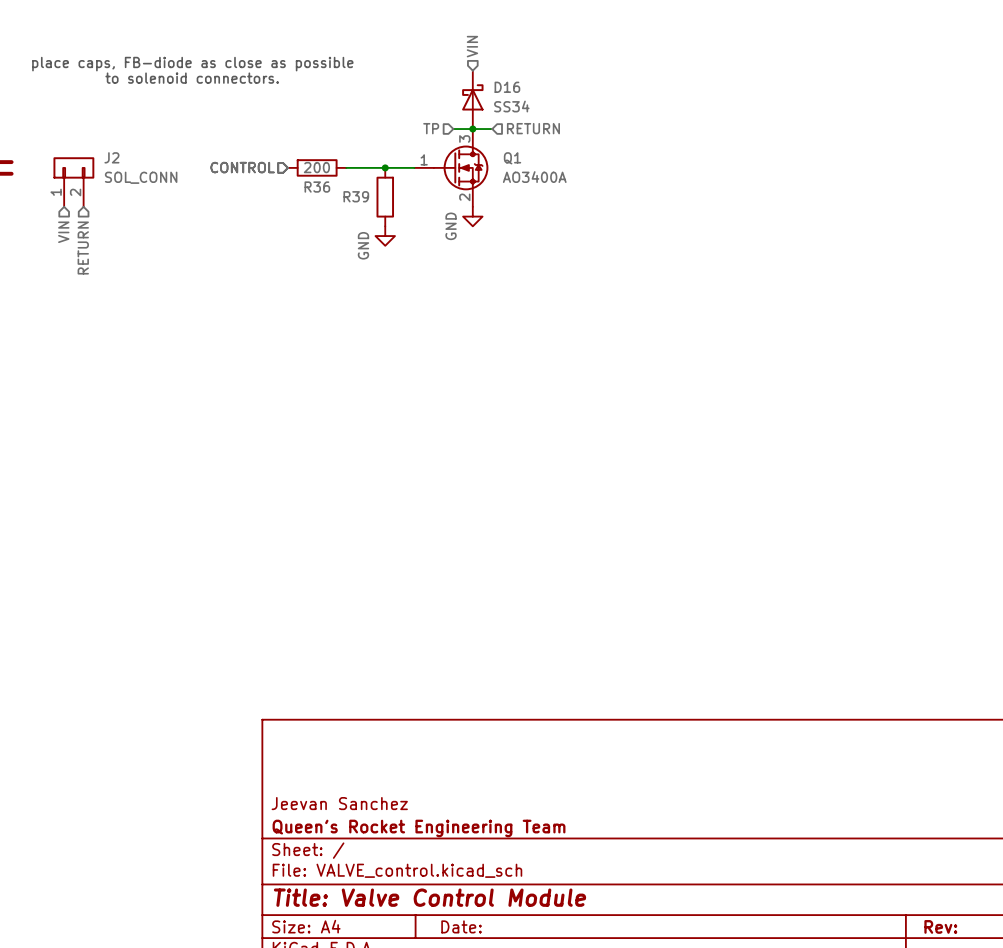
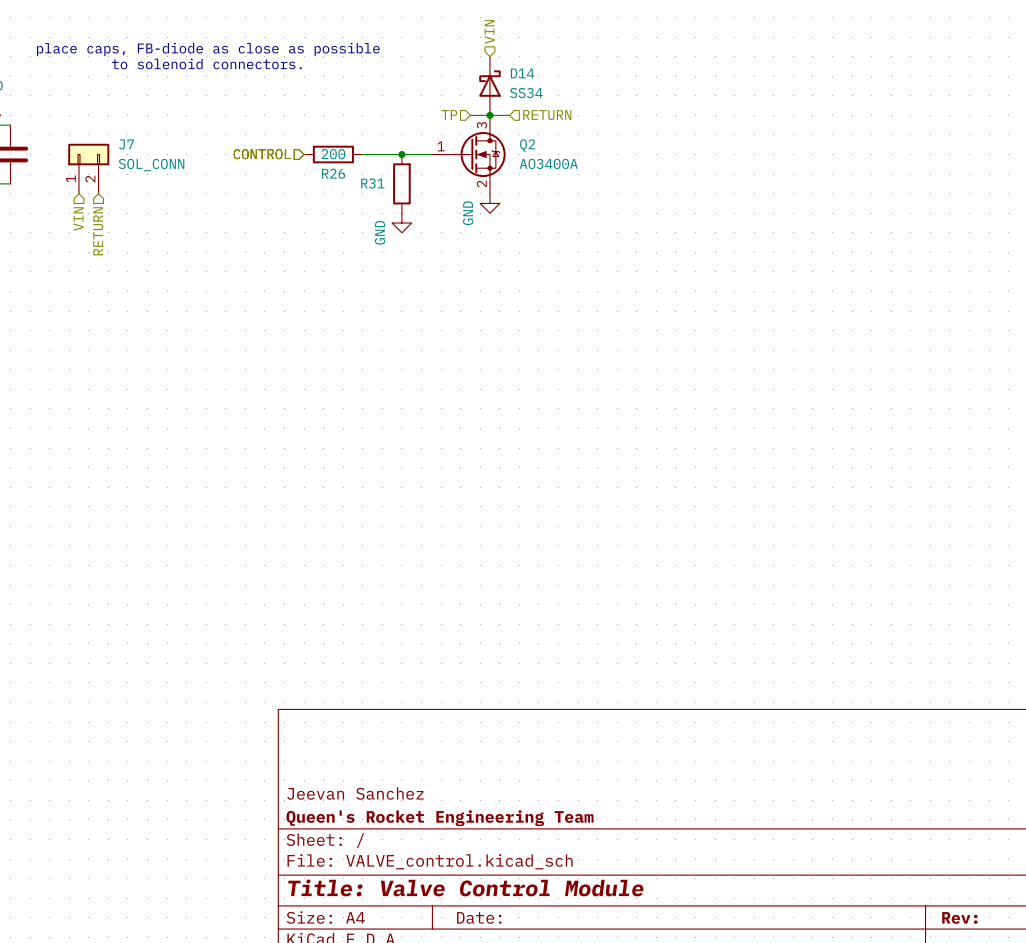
D16 name: D16 (507, 87) -> D14 (522, 73)
J2 name: J2 (111, 157) -> J7 (126, 144)
Q1 name: Q1 (512, 158) -> Q2 (527, 145)
R36 name: R36 (317, 187) -> R26 (333, 173)
R39 name: R39 (356, 196) -> R31 (372, 183)

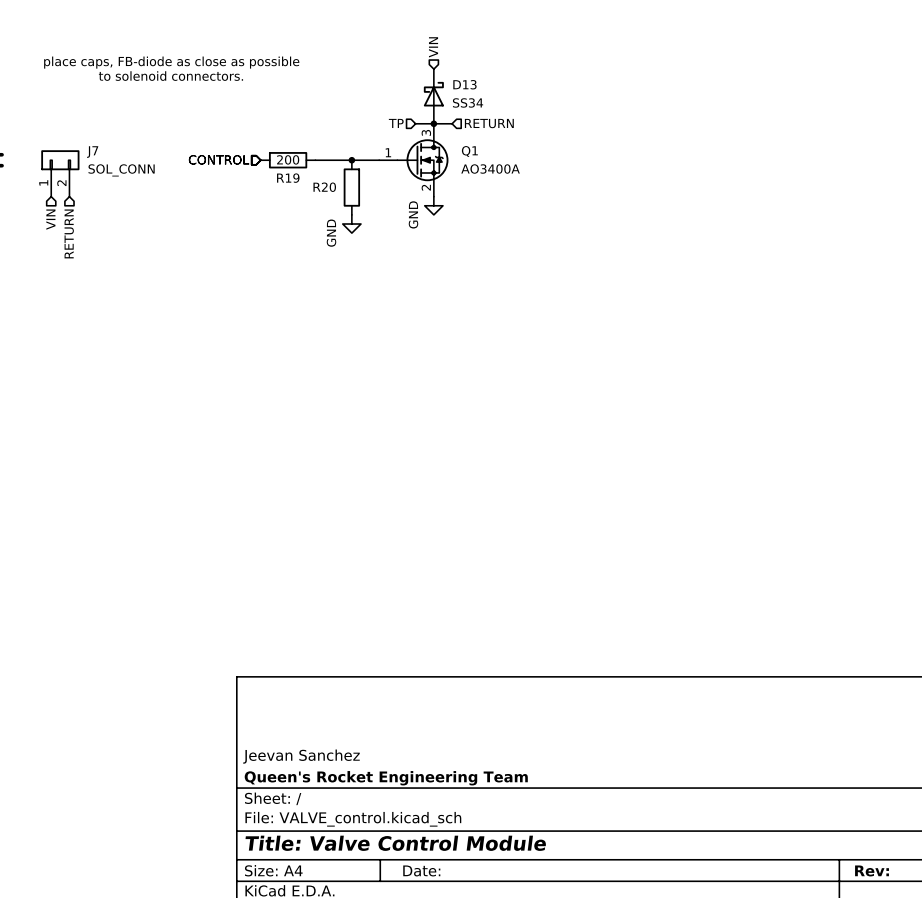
D14 name: D14 (522, 73) -> D13 (464, 84)
Q2 name: Q2 (527, 145) -> Q1 (469, 151)
R26 name: R26 (333, 173) -> R19 (288, 178)
R31 name: R31 (372, 183) -> R20 (324, 187)

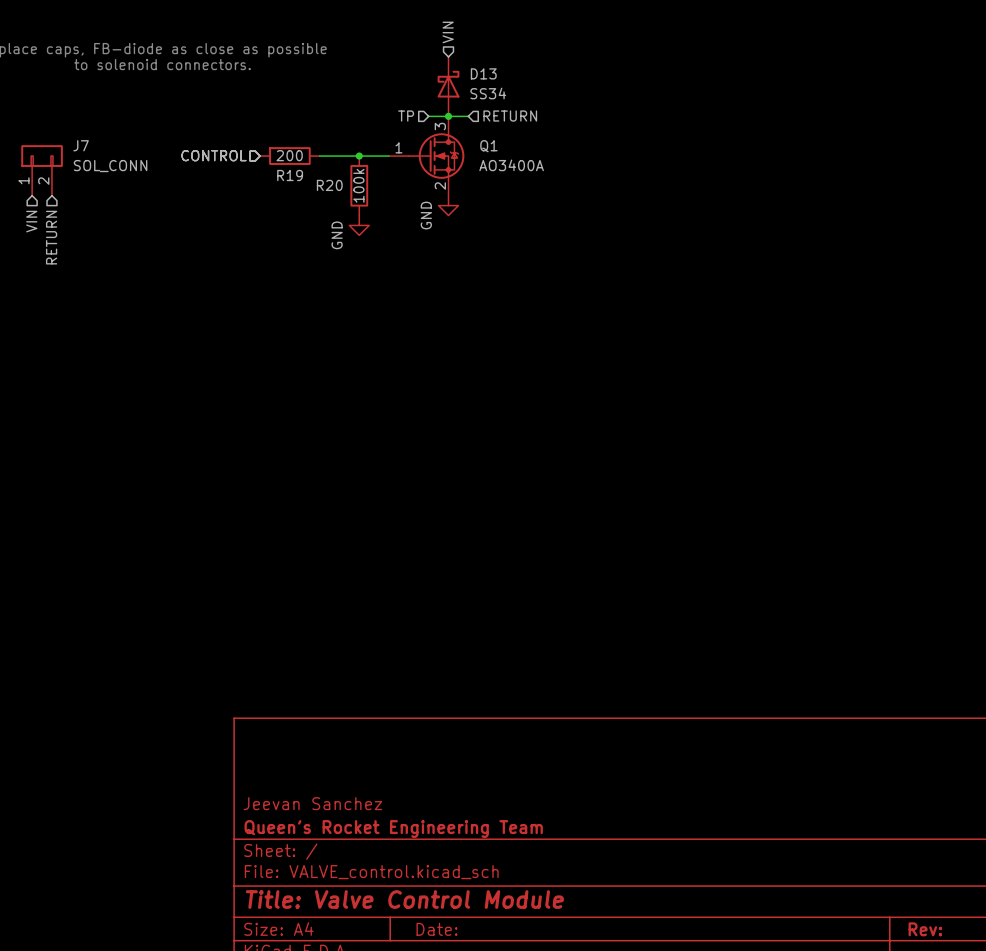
R20 value: none -> 100k (358, 185)

